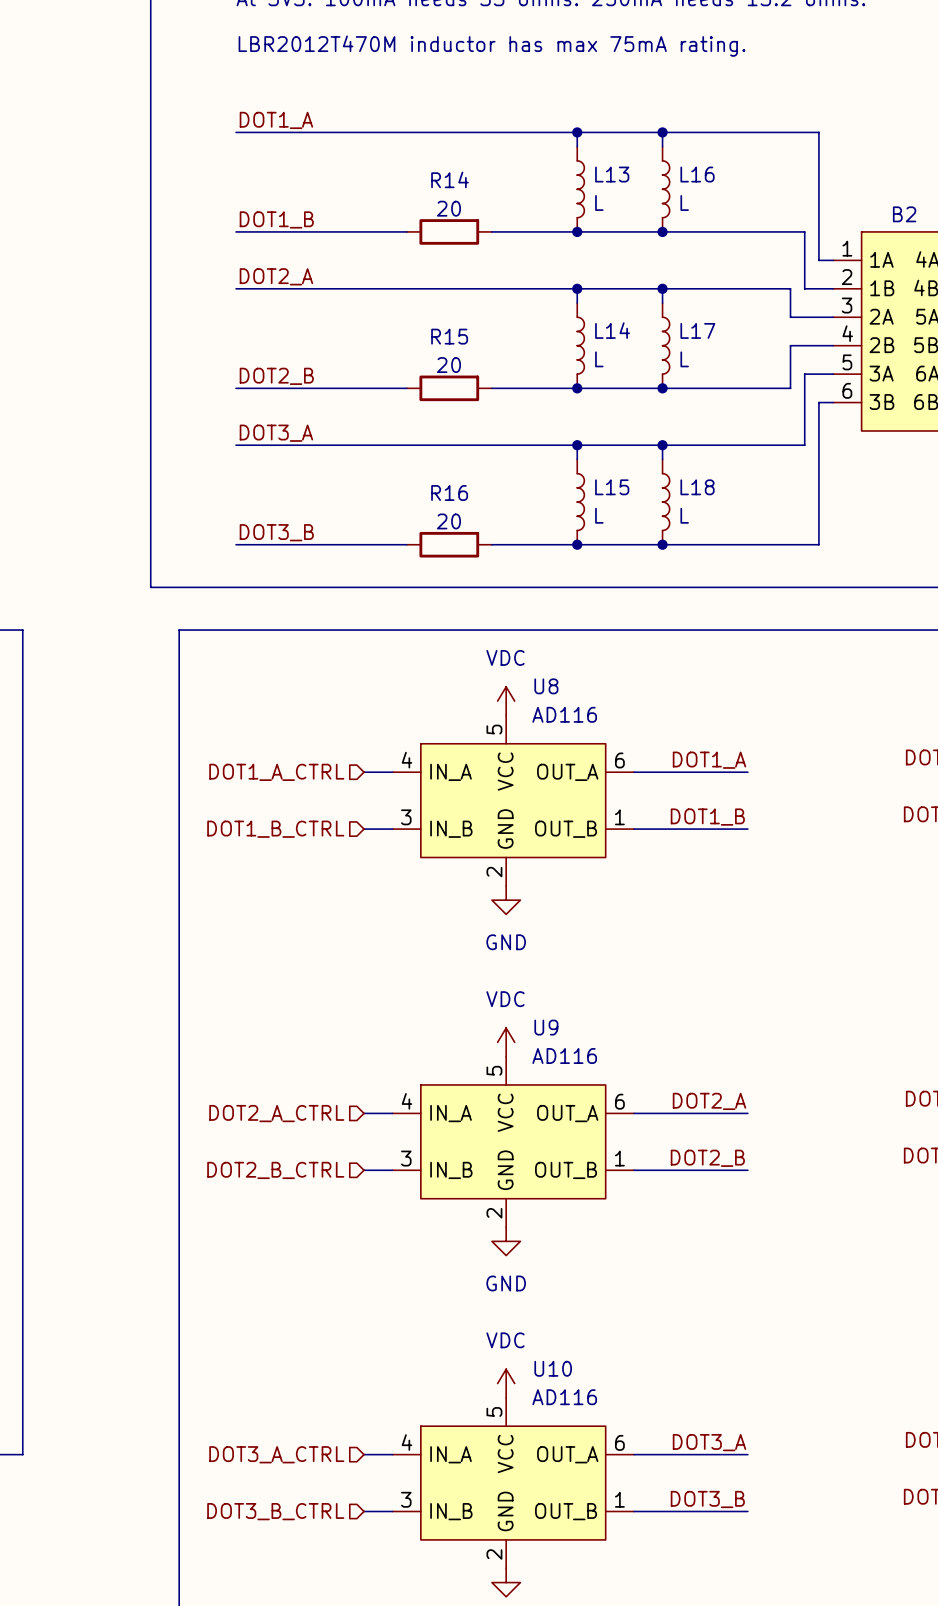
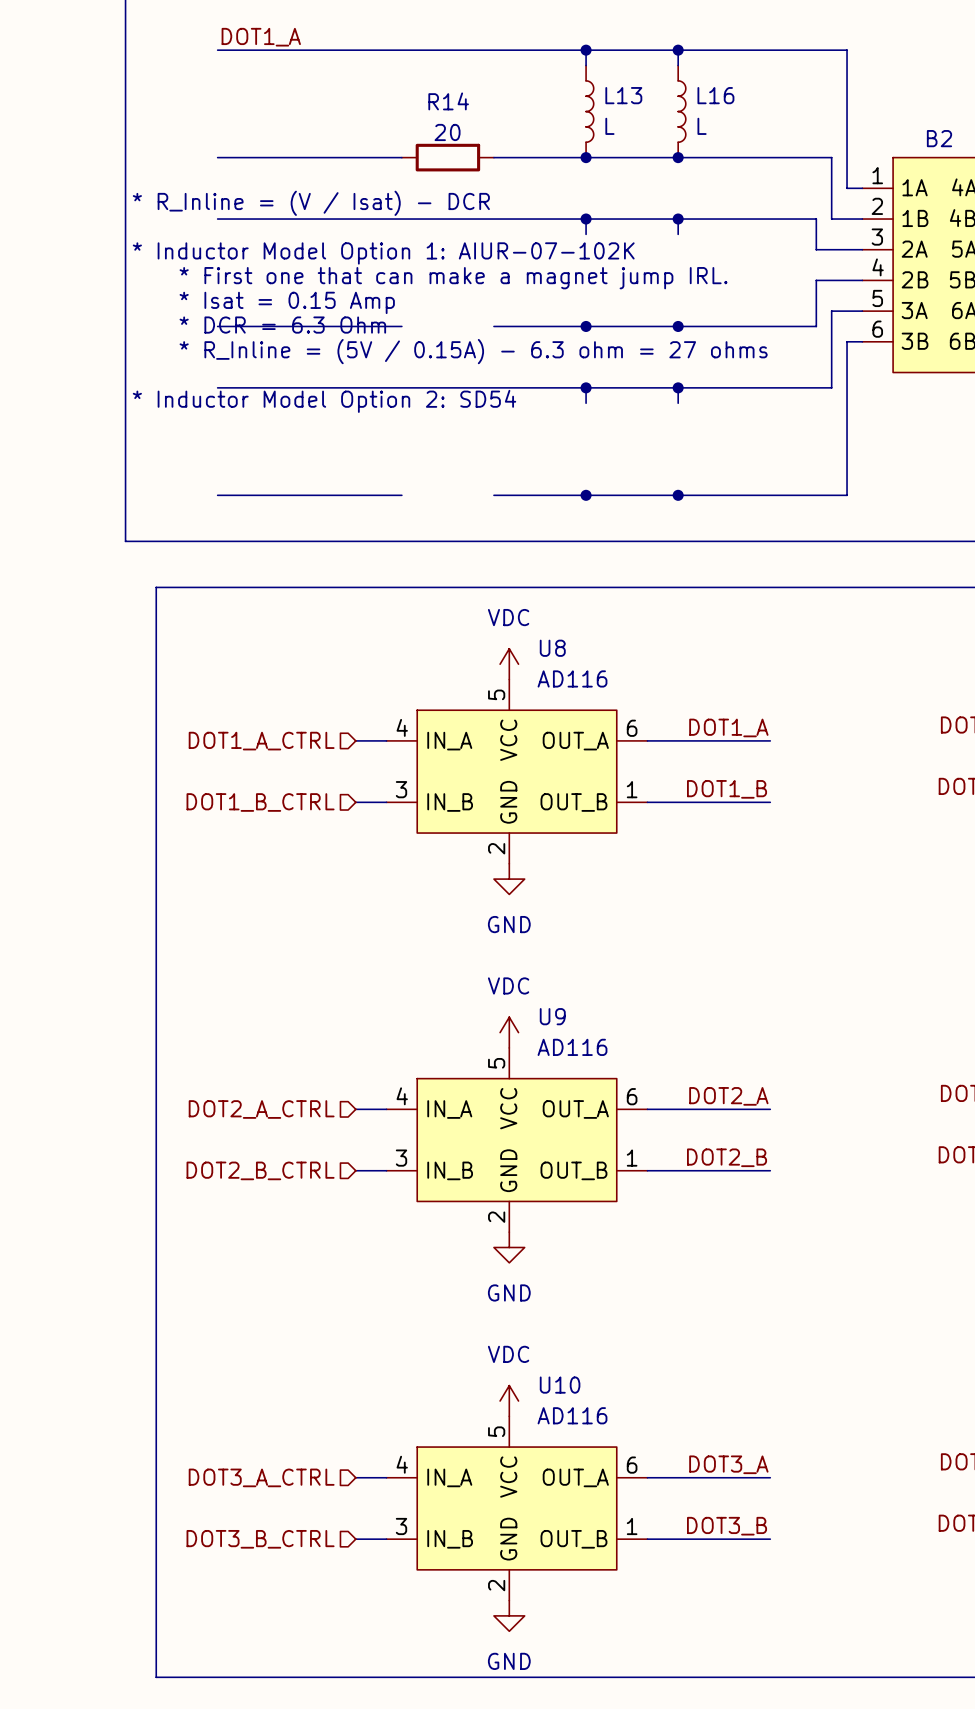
label: DOT1_B (276, 219) -> none
text: none -> * R_Inline = (V / Isat) - DCR (311, 203)
label: DOT2_A (276, 276) -> none
text: none -> * Inductor Model Option 1: AIUR-07-102K (383, 253)
text: none -> * First one that can make a magnet jump IRL. (453, 278)
L14: L (580, 345) -> none
L17: L (666, 345) -> none
text: none -> * Isat = 0.15 Amp (287, 302)
label: DOT2_B (276, 376) -> none
text: none -> * DCR = 6.3 Ohm (282, 325)
R15: 20 (449, 388) -> none
text: none -> * R_Inline = (5V / 0.15A) - 6.3 ohm = 27 ohms (473, 351)
label: DOT3_A (276, 433) -> none
text: none -> * Inductor Model Option 2: SD54 (324, 401)
L15: L (580, 502) -> none
L18: L (666, 502) -> none
label: DOT3_B (276, 532) -> none
R16: 20 (449, 544) -> none

